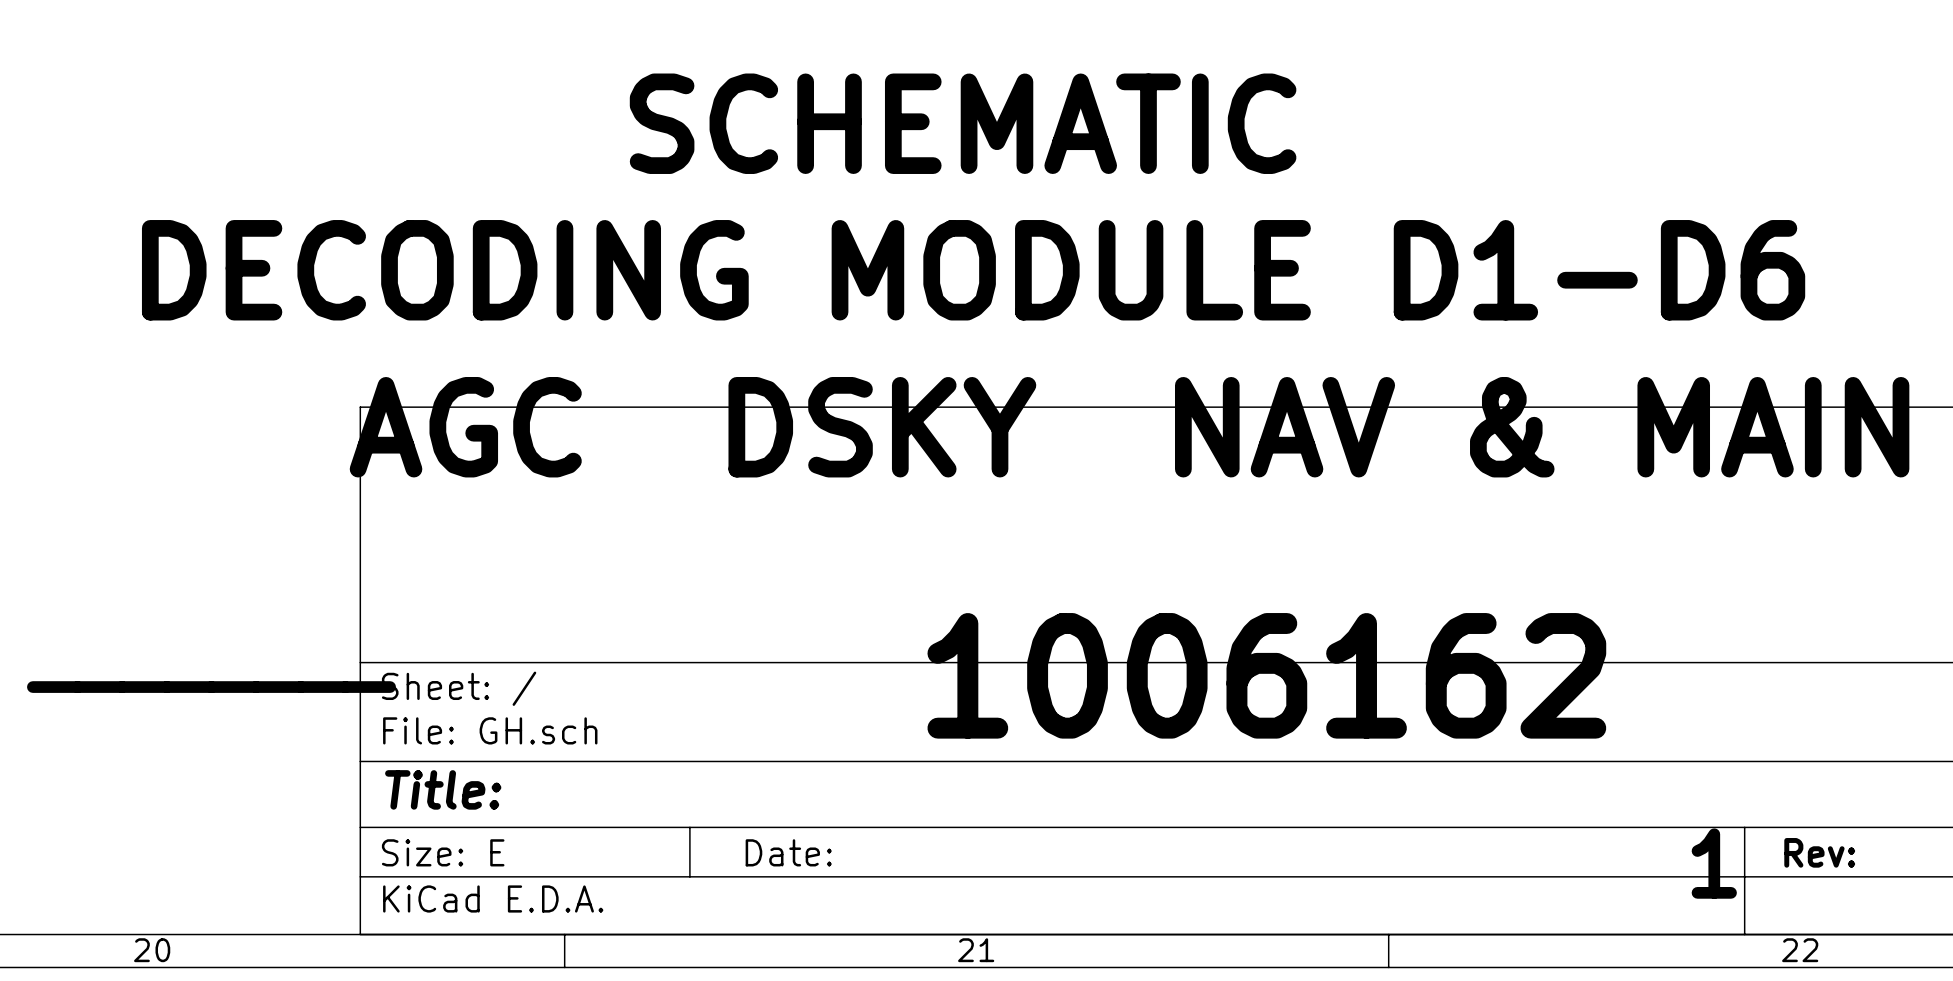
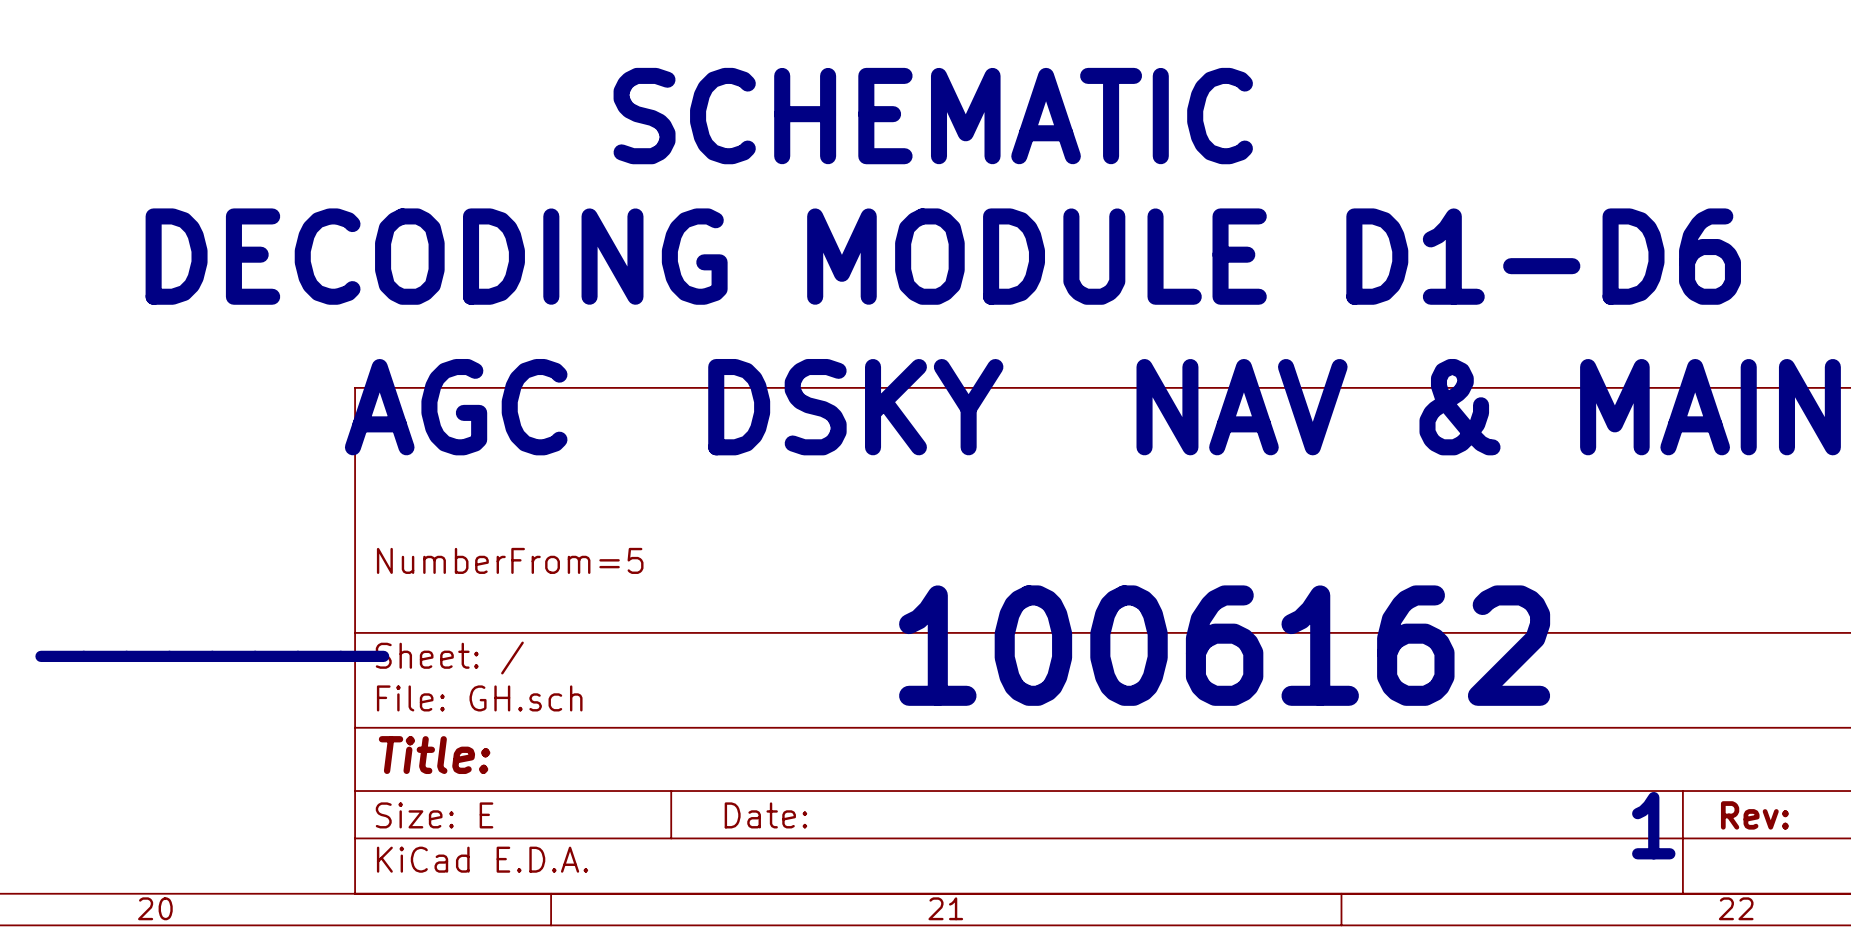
title block: none -> NumberFrom=5 (510, 560)

